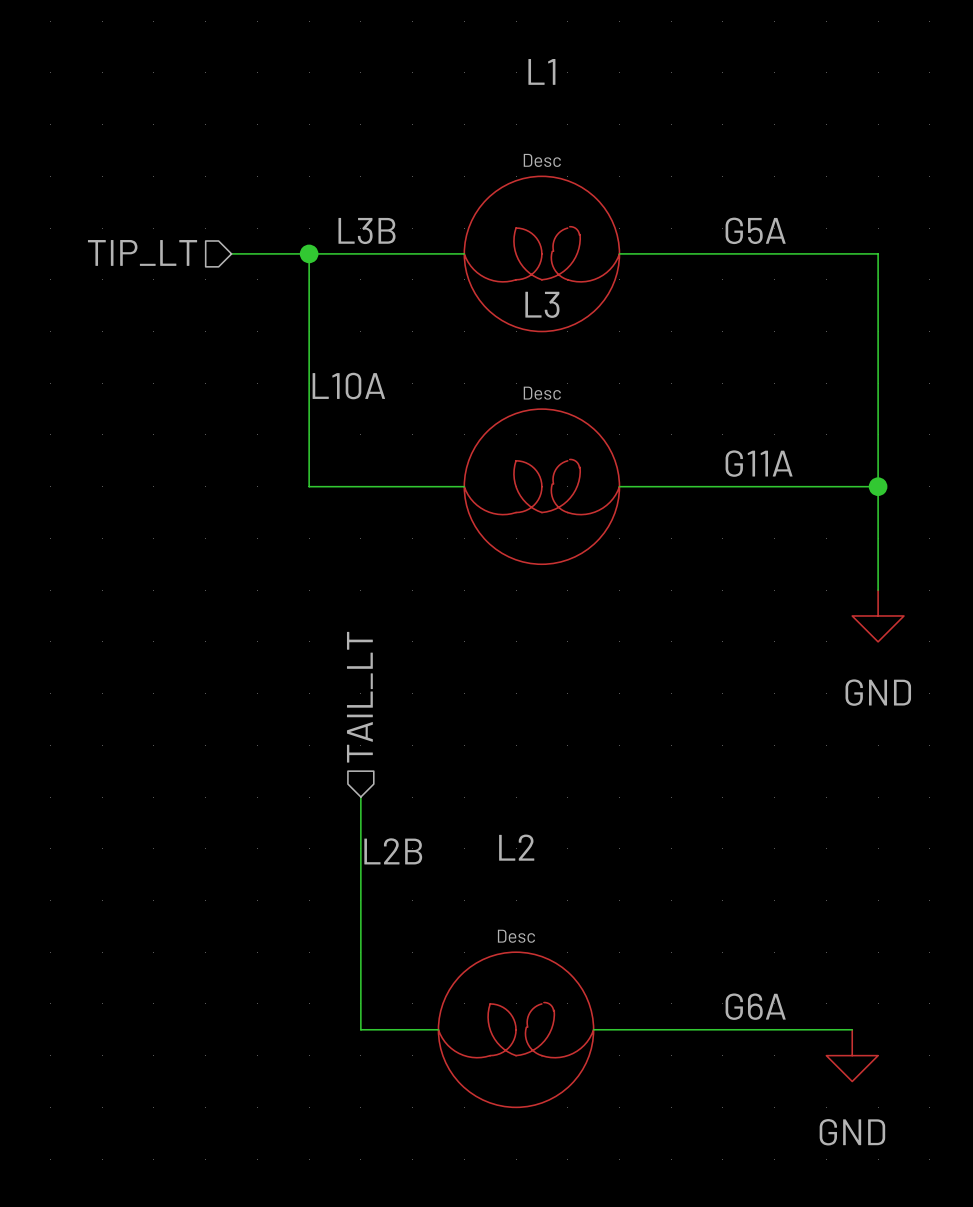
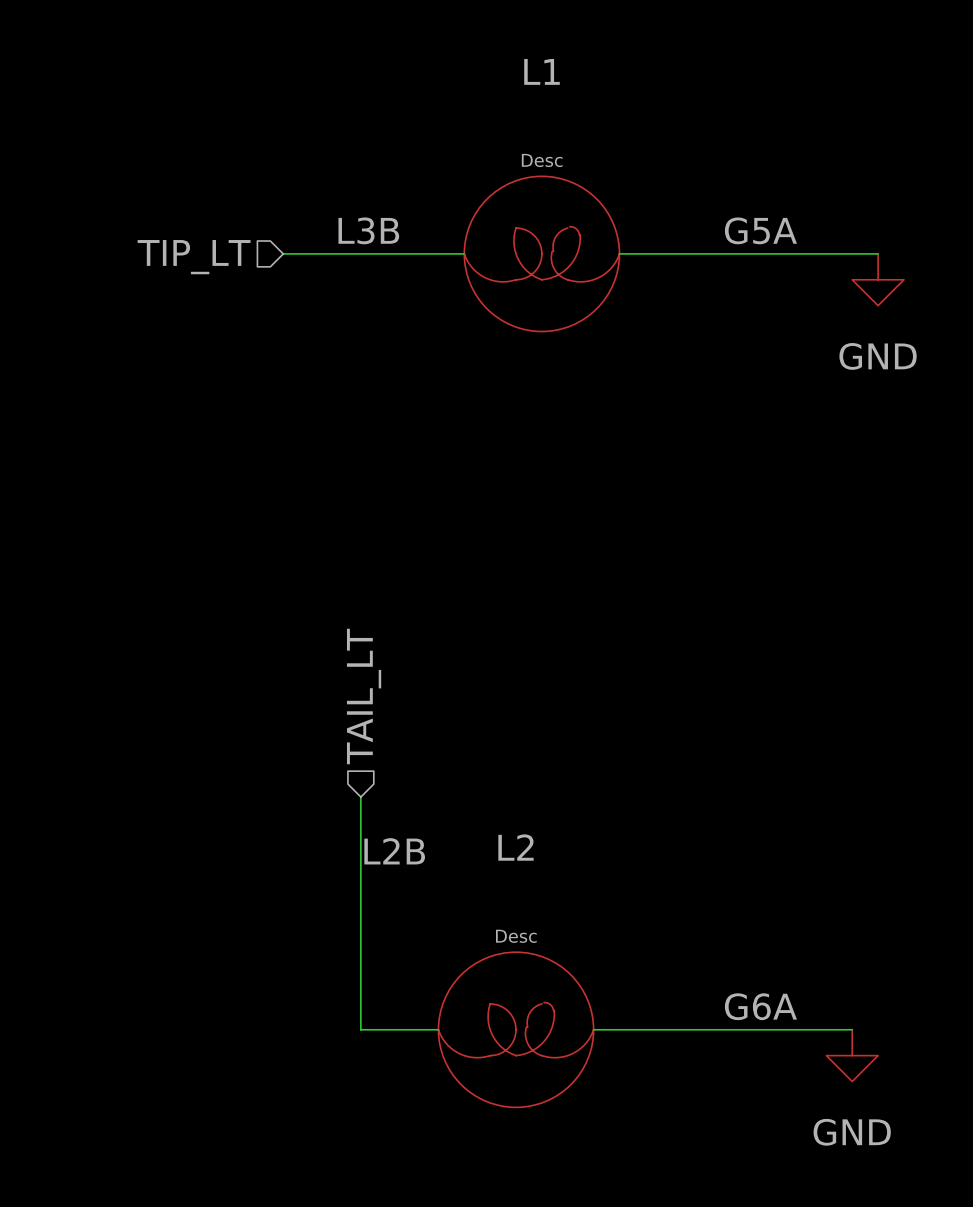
hierarchical label position: TIP_LT (142, 252) -> TIP_LT (194, 257)
wire: (231, 253) (283, 253) -> none
wire: (309, 253) (309, 486) (464, 486) -> none
junction: (309, 253) -> none
wire: (878, 253) (878, 590) -> none
label: L10A (348, 386) -> none
label: G11A (759, 463) -> none
L3: (541, 486) -> none
wire: (619, 486) (878, 486) -> none
junction: (878, 486) -> none
power symbol position: GND (878, 615) -> GND (878, 279)

